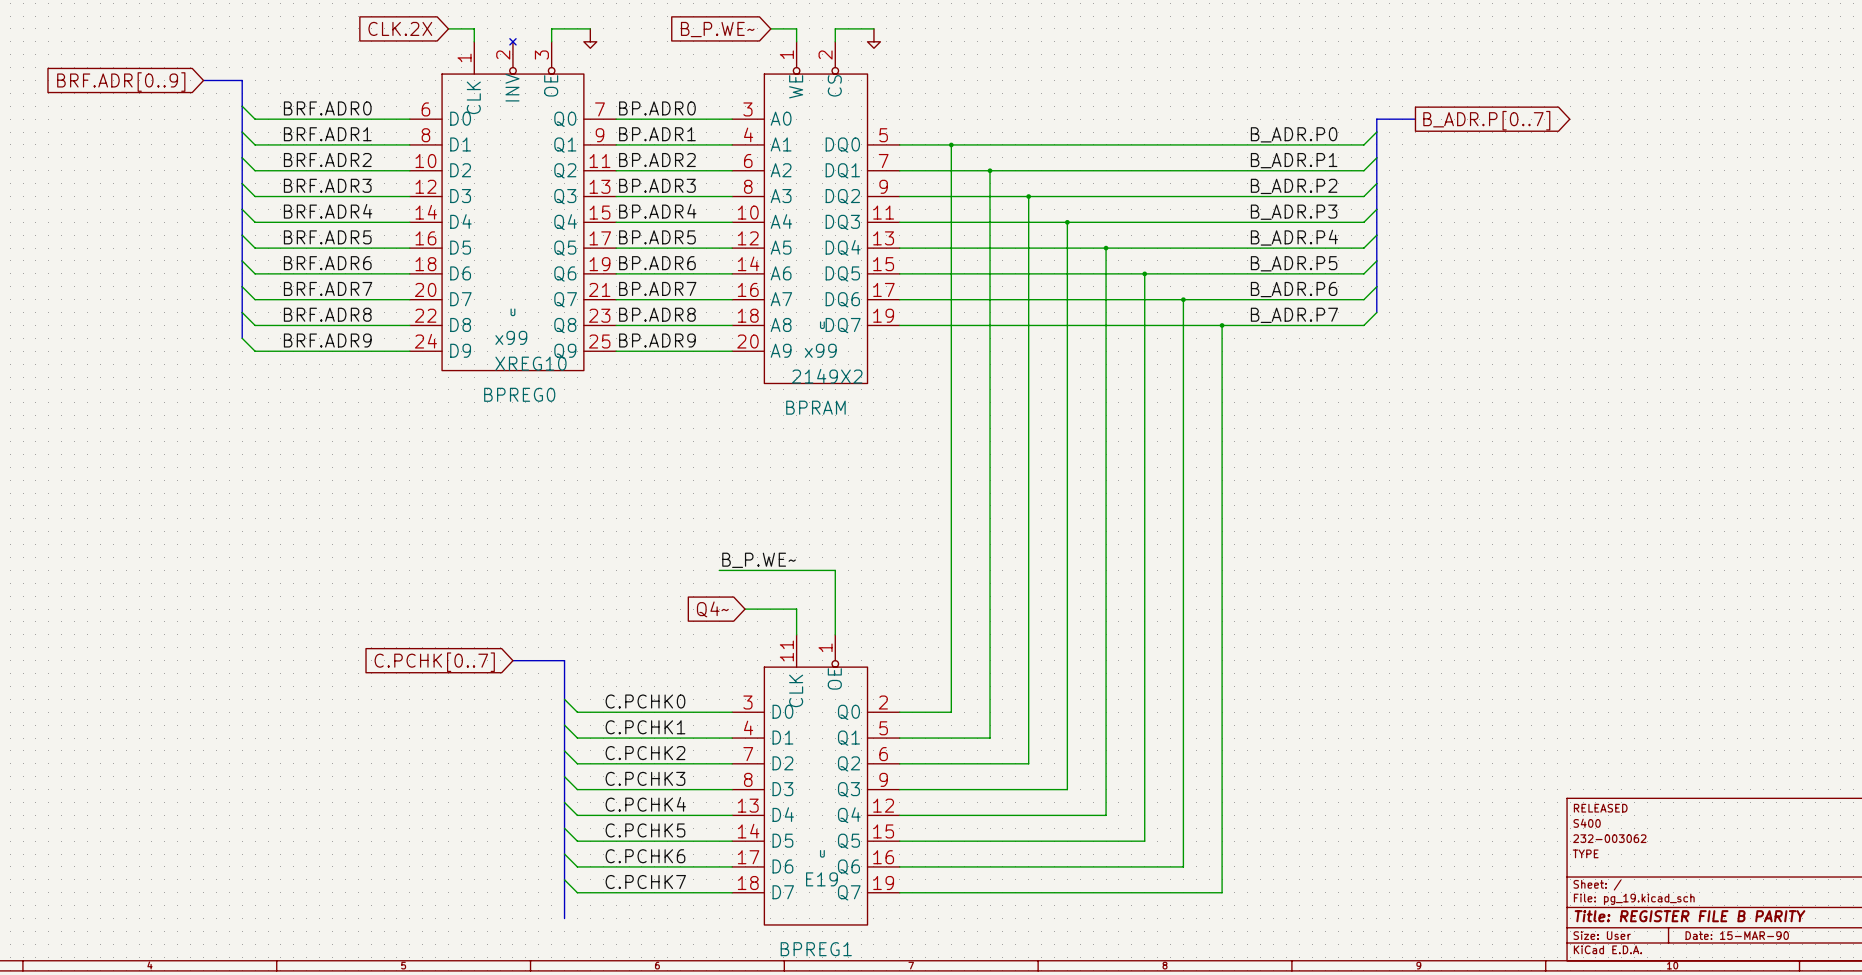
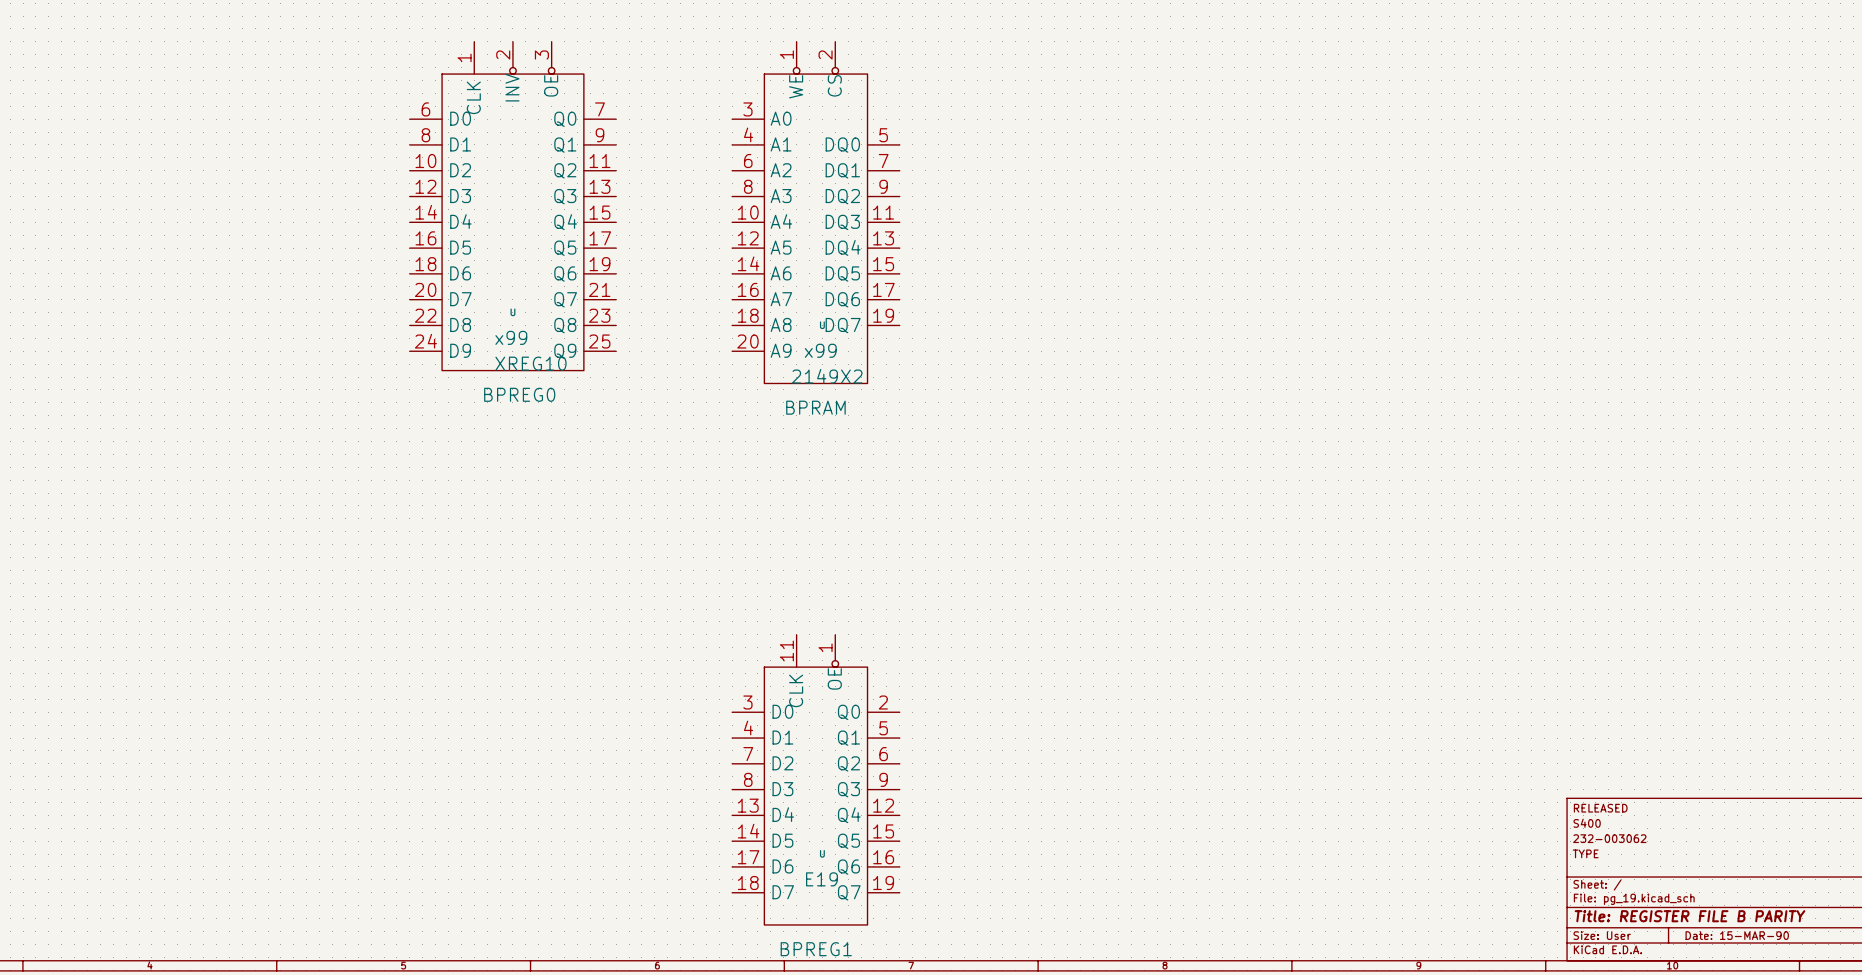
global label: CLK.2X (400, 28) -> none
wire: (448, 28) (474, 28) (474, 41) -> none
wire: (590, 28) (551, 28) (551, 41) -> none
wire: (770, 28) (796, 28) (796, 41) -> none
wire: (873, 28) (835, 28) (835, 41) -> none
global label: B_P.WE~ (717, 29) -> none
power symbol: (590, 38) -> none
power symbol: (873, 38) -> none
no-connect mark: (512, 41) -> none
bus: (203, 80) (242, 80) (242, 338) -> none
global label: BRF.ADR[0..9] (121, 82) -> none
wire: (242, 106) (255, 119) (409, 119) -> none
label: BRF.ADR0 (327, 108) -> none
label: BP.ADR0 (657, 108) -> none
wire: (616, 119) (732, 119) -> none
bus: (1415, 119) (1376, 119) (1376, 312) -> none
global label: B_ADR.P[0..7] (1486, 120) -> none
wire: (242, 132) (255, 144) (409, 144) -> none
wire: (1376, 132) (1363, 144) (899, 144) -> none
label: BRF.ADR1 (327, 134) -> none
label: BP.ADR1 (657, 134) -> none
label: B_ADR.P0 (1294, 134) -> none
wire: (616, 144) (732, 144) -> none
wire: (951, 144) (951, 712) (899, 712) -> none
junction: (951, 144) -> none
wire: (242, 157) (255, 170) (409, 170) -> none
wire: (1376, 157) (1363, 170) (899, 170) -> none
label: BRF.ADR2 (327, 160) -> none
label: BP.ADR2 (657, 160) -> none
label: B_ADR.P1 (1294, 160) -> none
wire: (616, 170) (732, 170) -> none
wire: (990, 170) (990, 738) (899, 738) -> none
junction: (990, 170) -> none
wire: (242, 183) (255, 196) (409, 196) -> none
wire: (1376, 183) (1363, 196) (899, 196) -> none
label: BRF.ADR3 (327, 185) -> none
label: BP.ADR3 (657, 185) -> none
label: B_ADR.P2 (1294, 186) -> none
wire: (616, 196) (732, 196) -> none
wire: (1028, 196) (1028, 763) (899, 763) -> none
junction: (1028, 196) -> none
wire: (242, 209) (255, 222) (409, 222) -> none
wire: (1376, 209) (1363, 222) (899, 222) -> none
label: BRF.ADR4 (328, 211) -> none
label: BP.ADR4 (657, 211) -> none
label: B_ADR.P3 (1294, 212) -> none
wire: (616, 222) (732, 222) -> none
wire: (1067, 222) (1067, 789) (899, 789) -> none
junction: (1067, 222) -> none
wire: (242, 235) (255, 248) (409, 248) -> none
wire: (1376, 235) (1363, 248) (899, 248) -> none
label: BRF.ADR5 (327, 237) -> none
label: BP.ADR5 (657, 237) -> none
label: B_ADR.P4 (1294, 237) -> none
wire: (616, 248) (732, 248) -> none
wire: (1106, 248) (1106, 815) (899, 815) -> none
junction: (1106, 248) -> none
wire: (242, 260) (255, 273) (409, 273) -> none
wire: (1376, 260) (1363, 273) (899, 273) -> none
label: BRF.ADR6 (327, 263) -> none
label: BP.ADR6 (657, 263) -> none
label: B_ADR.P5 (1294, 263) -> none
wire: (616, 273) (732, 273) -> none
wire: (1144, 273) (1144, 841) (899, 841) -> none
junction: (1144, 273) -> none
wire: (242, 286) (255, 299) (409, 299) -> none
wire: (1376, 286) (1363, 299) (899, 299) -> none
label: BRF.ADR7 (328, 288) -> none
label: BP.ADR7 (657, 288) -> none
label: B_ADR.P6 (1294, 289) -> none
wire: (616, 299) (732, 299) -> none
wire: (1183, 299) (1183, 866) (899, 866) -> none
junction: (1183, 299) -> none
wire: (242, 312) (255, 325) (409, 325) -> none
wire: (1376, 312) (1363, 325) (899, 325) -> none
label: BRF.ADR8 (327, 314) -> none
label: BP.ADR8 (657, 314) -> none
label: B_ADR.P7 (1294, 315) -> none
wire: (616, 325) (732, 325) -> none
wire: (1222, 325) (1222, 892) (899, 892) -> none
junction: (1222, 325) -> none
wire: (242, 338) (255, 351) (409, 351) -> none
label: BRF.ADR9 (327, 340) -> none
label: BP.ADR9 (657, 340) -> none
wire: (616, 351) (732, 351) -> none
label: B_P.WE~ (759, 560) -> none
wire: (719, 570) (835, 570) (835, 634) -> none
global label: Q4~ (712, 609) -> none
wire: (745, 609) (796, 609) (796, 634) -> none
bus: (512, 660) (564, 660) (564, 918) -> none
global label: C.PCHK[0..7] (434, 662) -> none
wire: (564, 699) (577, 712) (732, 712) -> none
label: C.PCHK0 (645, 701) -> none
wire: (564, 725) (577, 738) (732, 738) -> none
label: C.PCHK1 (645, 727) -> none
wire: (564, 750) (577, 763) (732, 763) -> none
label: C.PCHK2 (645, 753) -> none
wire: (564, 776) (577, 789) (732, 789) -> none
label: C.PCHK3 (645, 778) -> none
wire: (564, 802) (577, 815) (732, 815) -> none
label: C.PCHK4 (645, 804) -> none
wire: (564, 828) (577, 841) (732, 841) -> none
label: C.PCHK5 (645, 830) -> none
wire: (564, 854) (577, 866) (732, 866) -> none
label: C.PCHK6 (645, 856) -> none
wire: (564, 879) (577, 892) (732, 892) -> none
label: C.PCHK7 (645, 882) -> none

